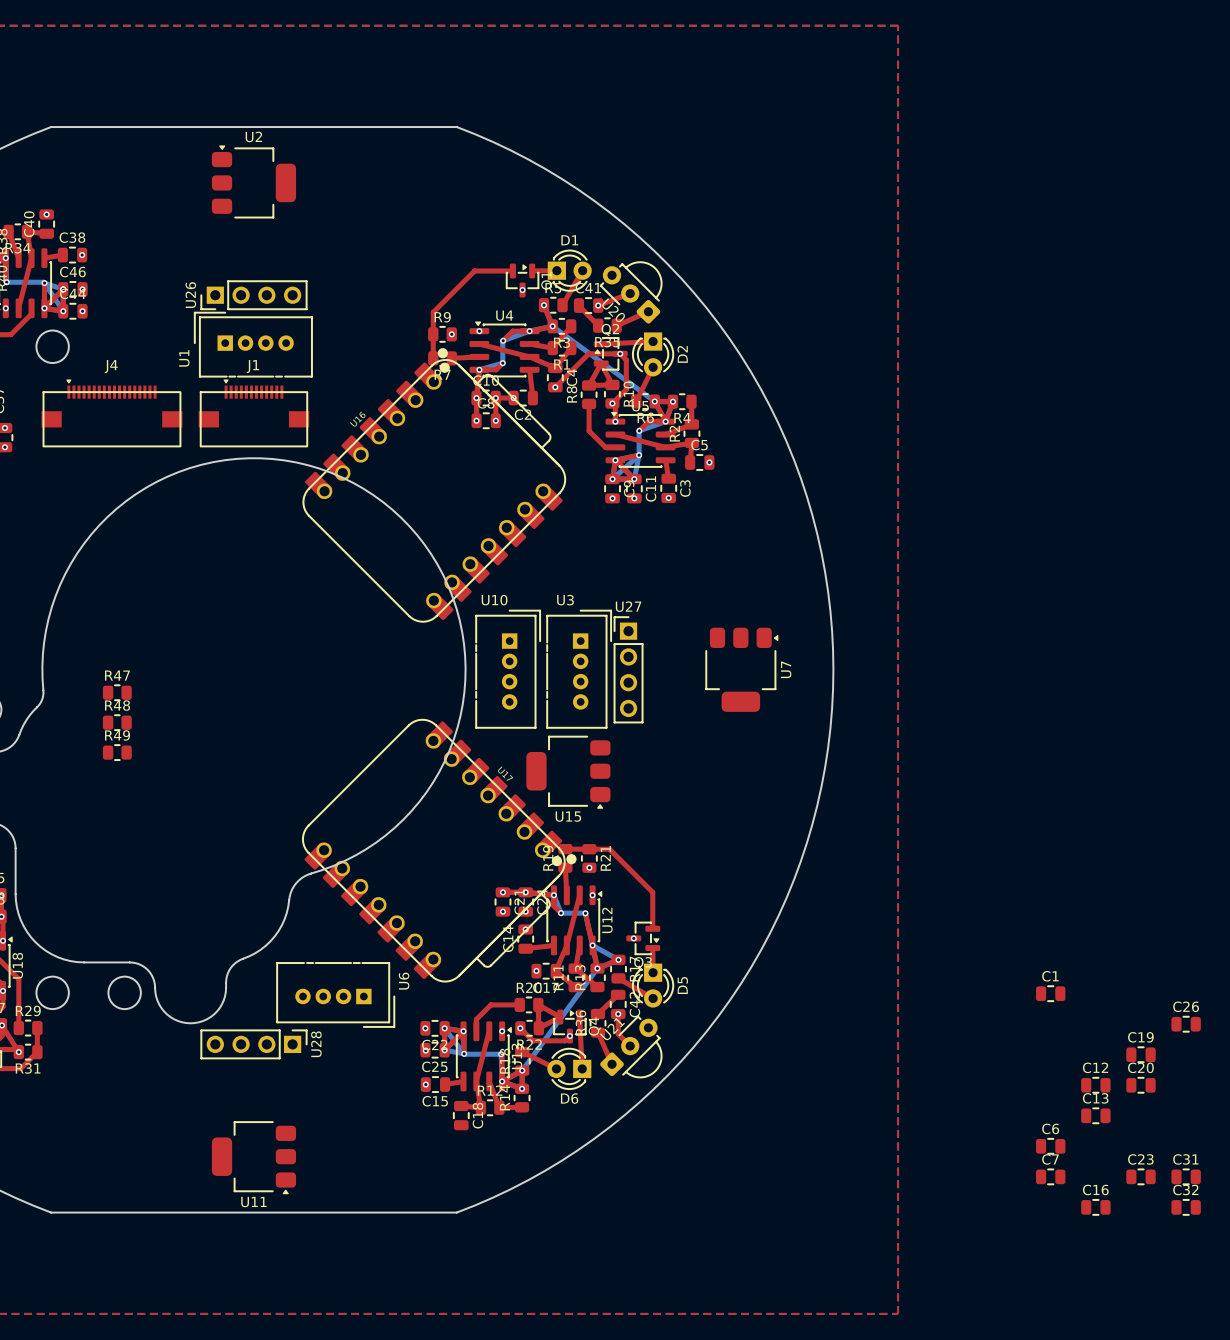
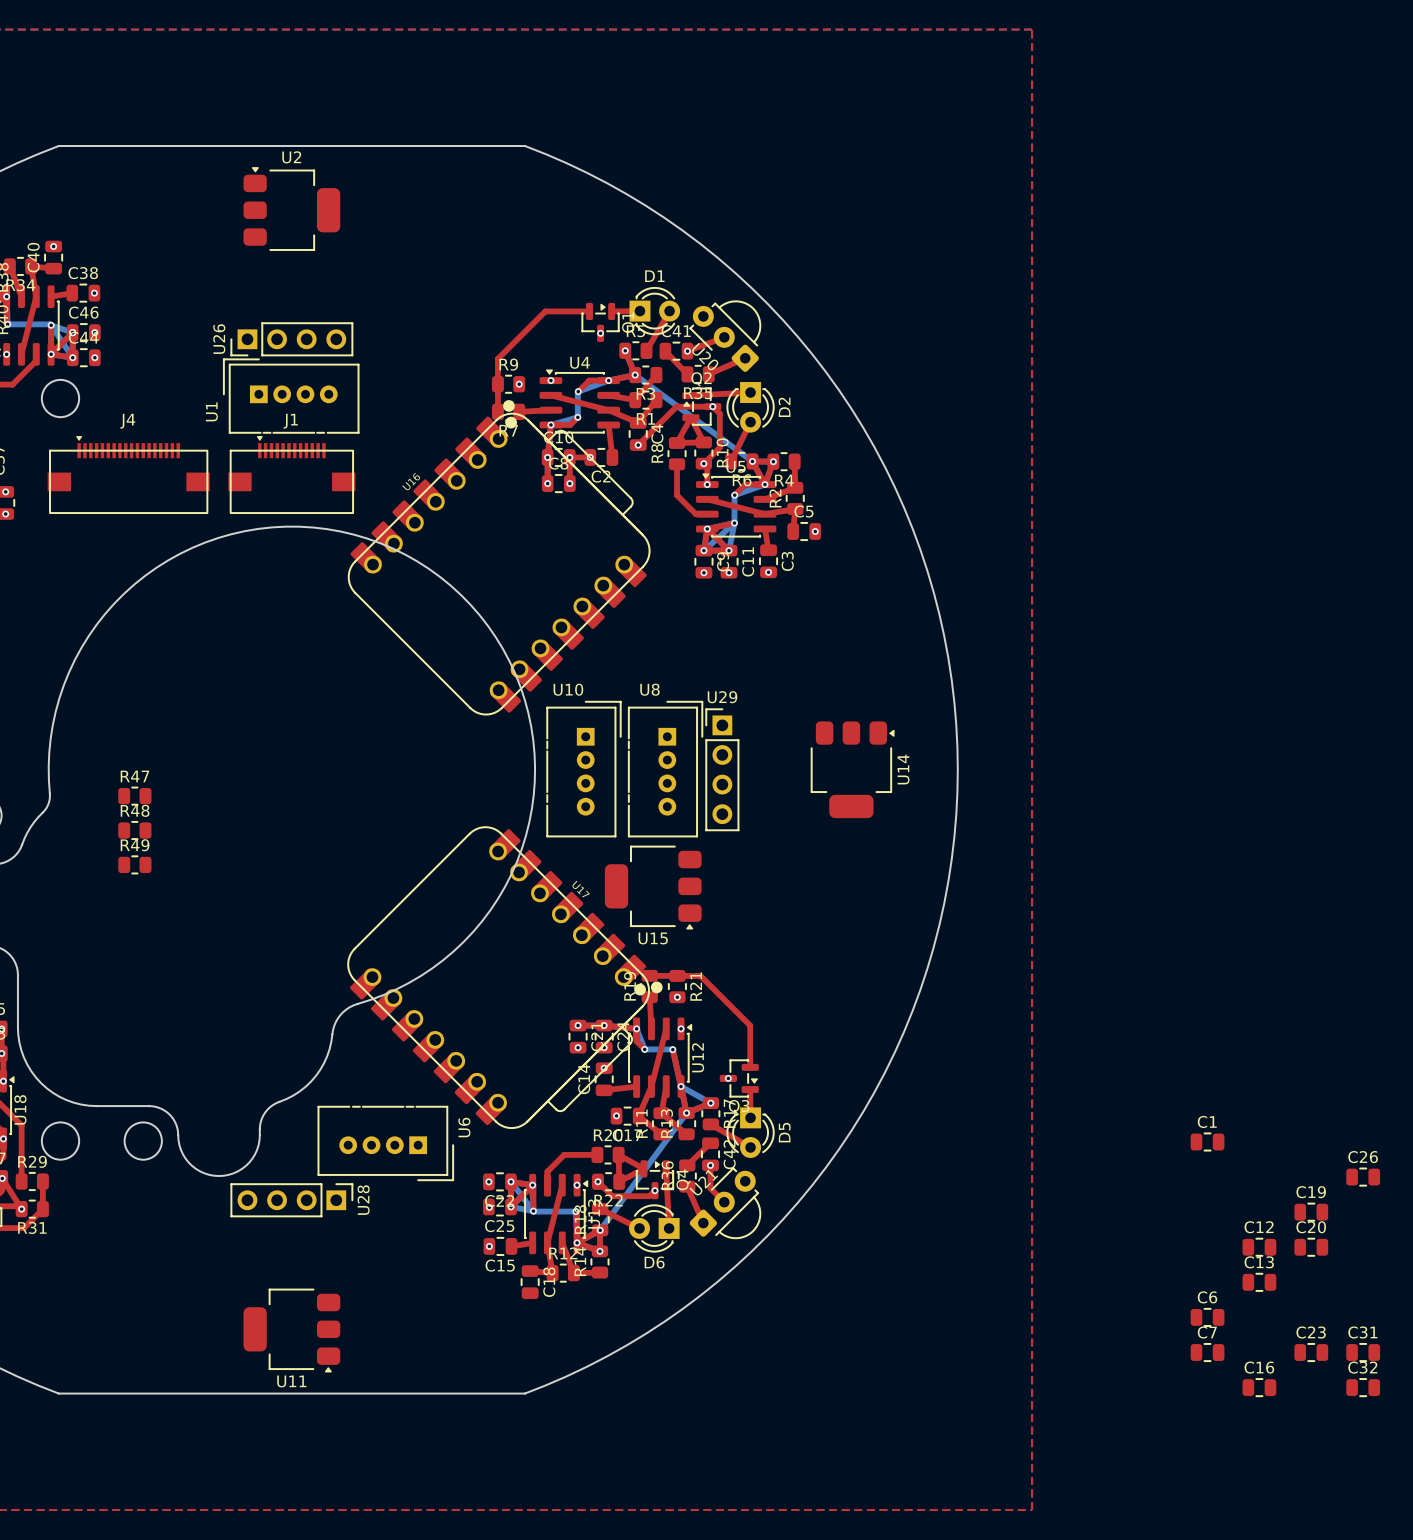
U3 name: U3 (565, 600) -> U8 (649, 689)
U27 name: U27 (628, 606) -> U29 (722, 697)
U7 name: U7 (786, 669) -> U14 (903, 769)

